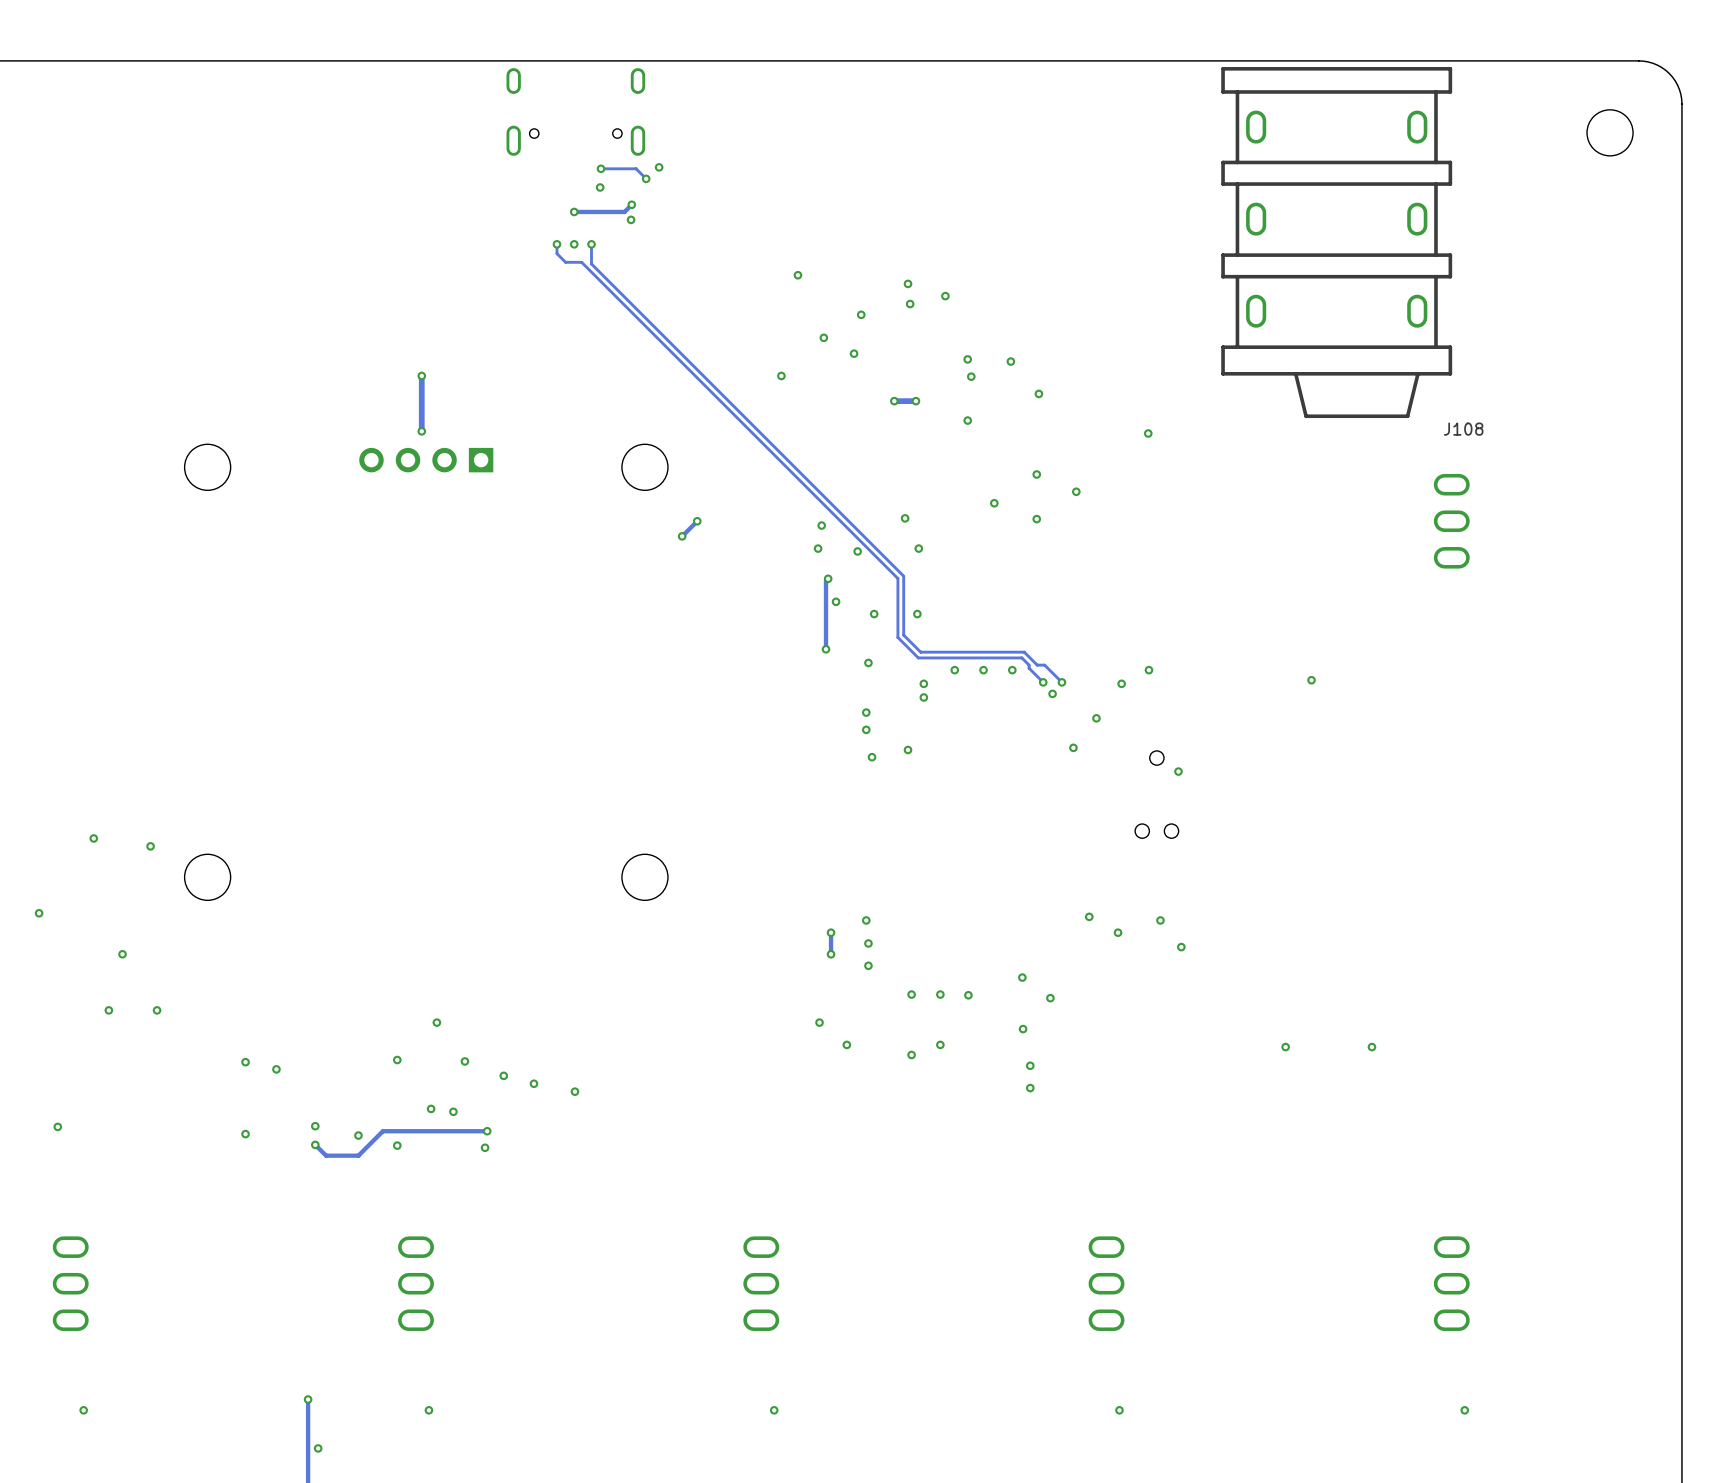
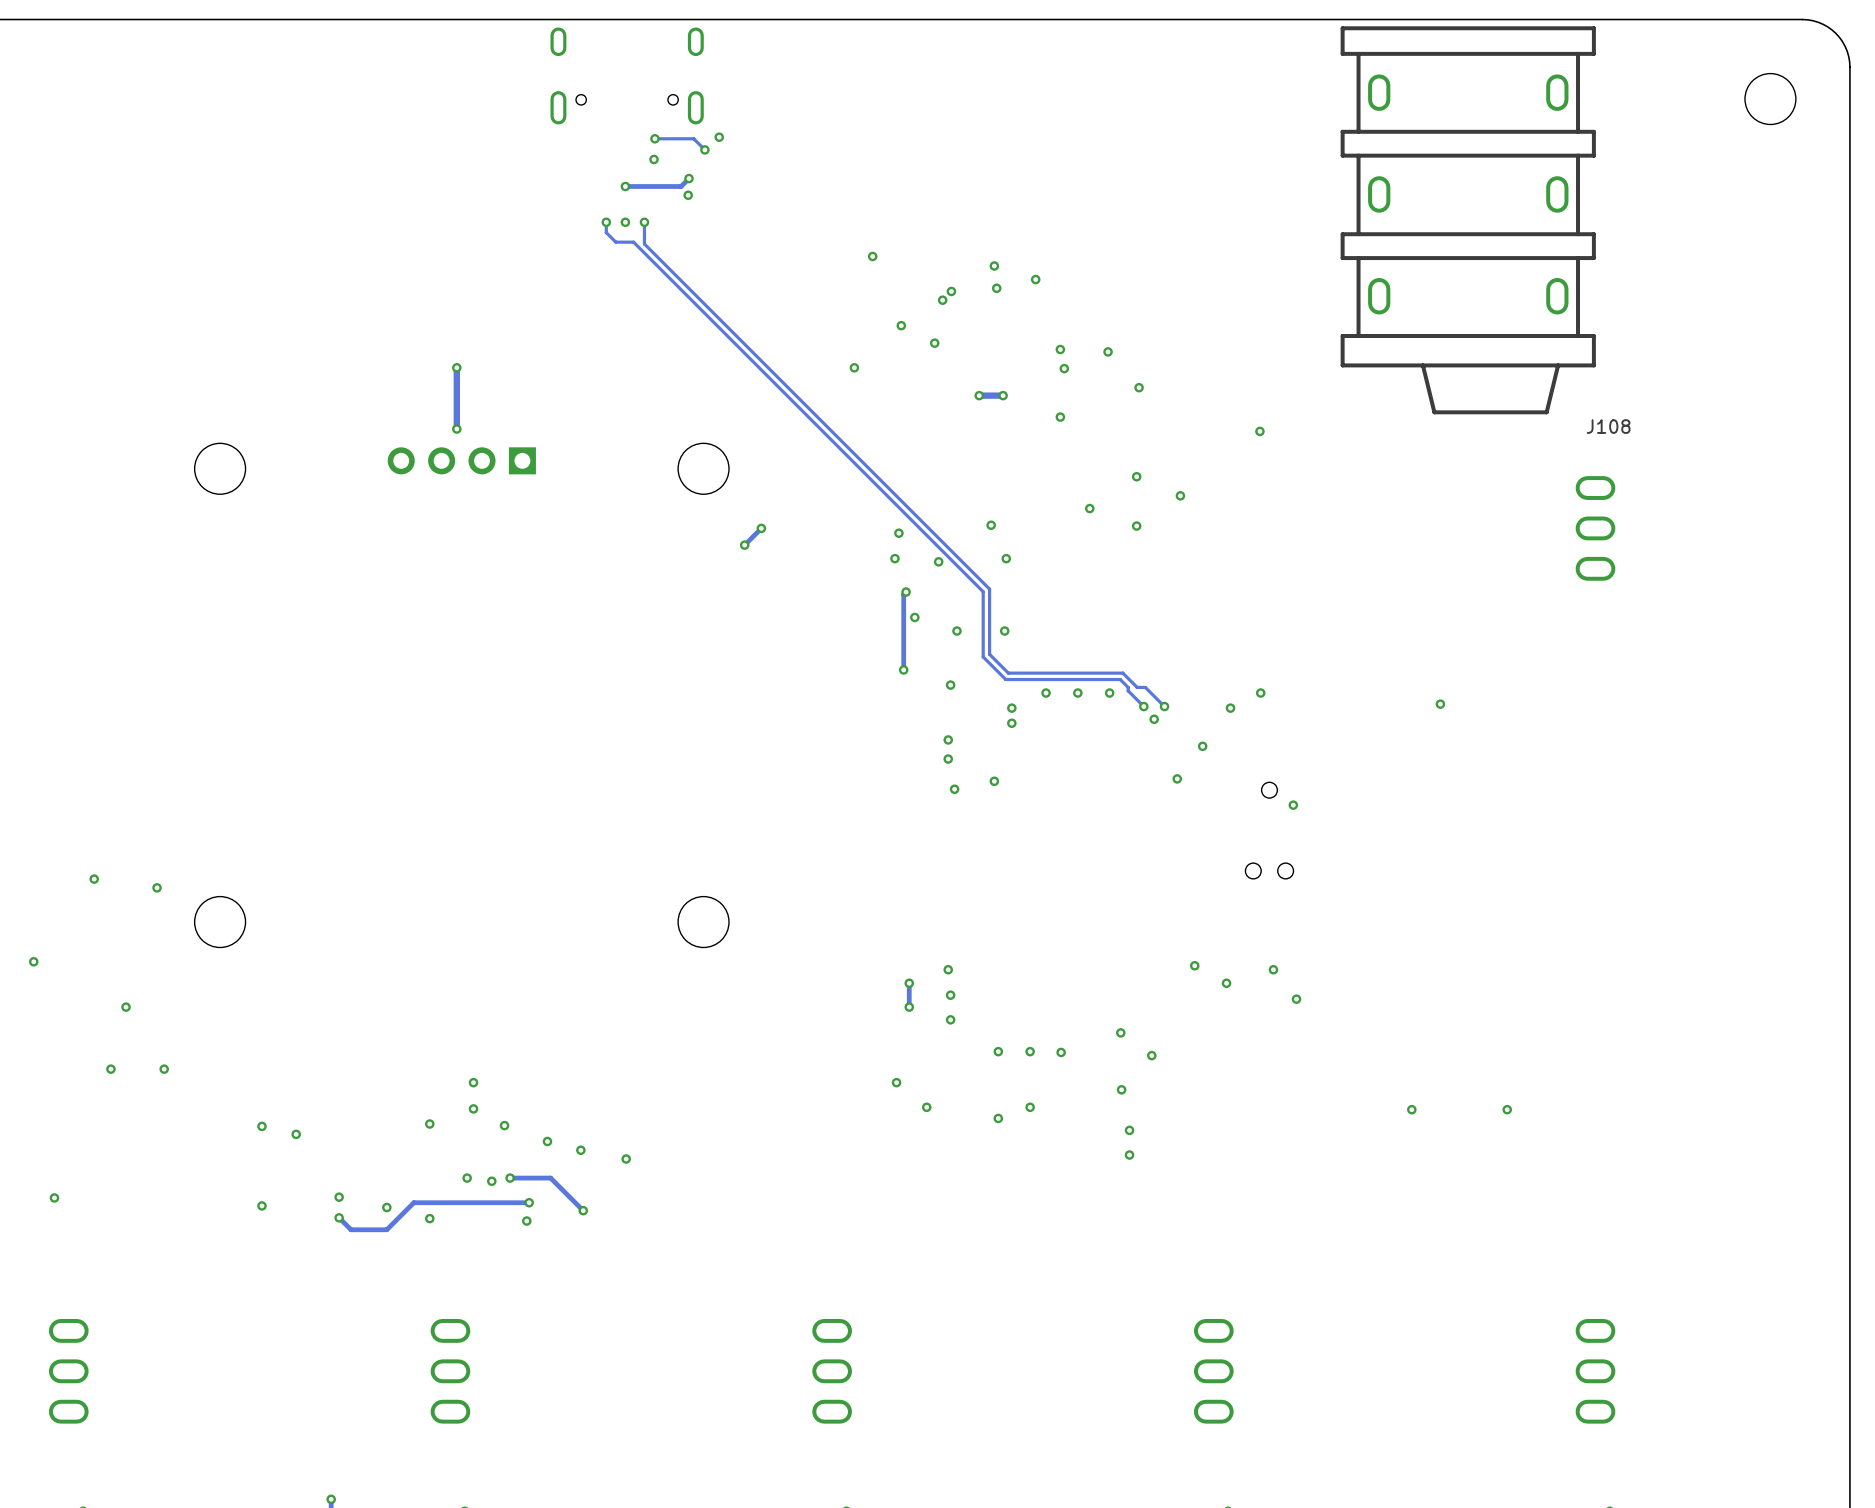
via: none -> (951, 291)
via: none -> (473, 1108)
track: none -> (510, 1178) (550, 1178) (583, 1210)
via: none -> (510, 1178)
via: none -> (583, 1210)

